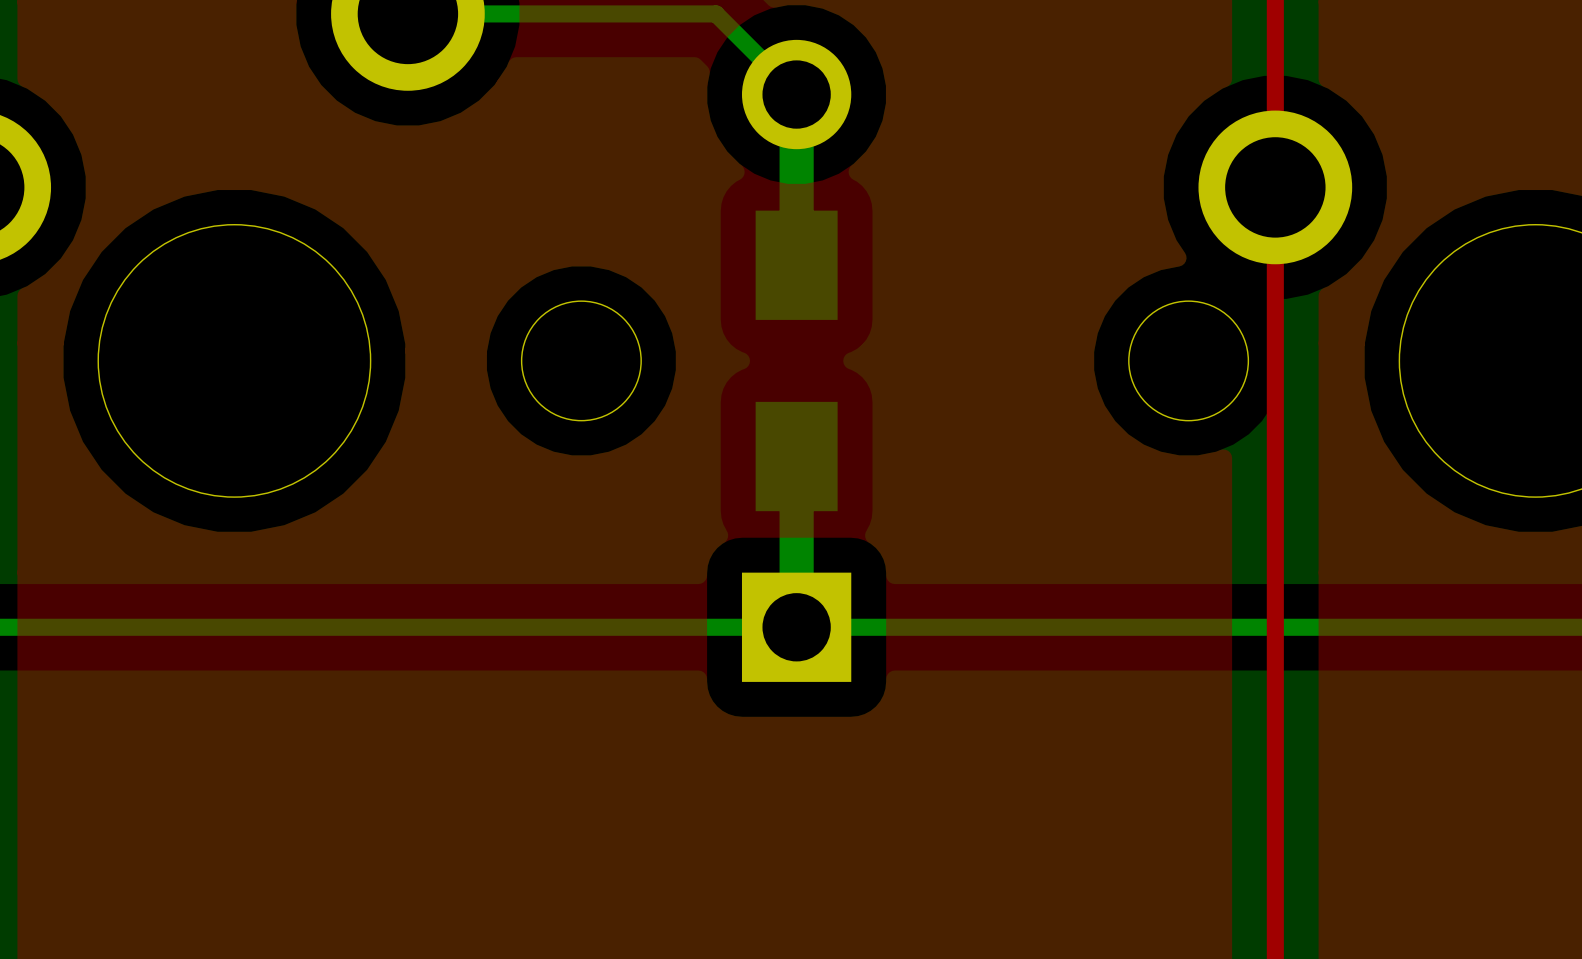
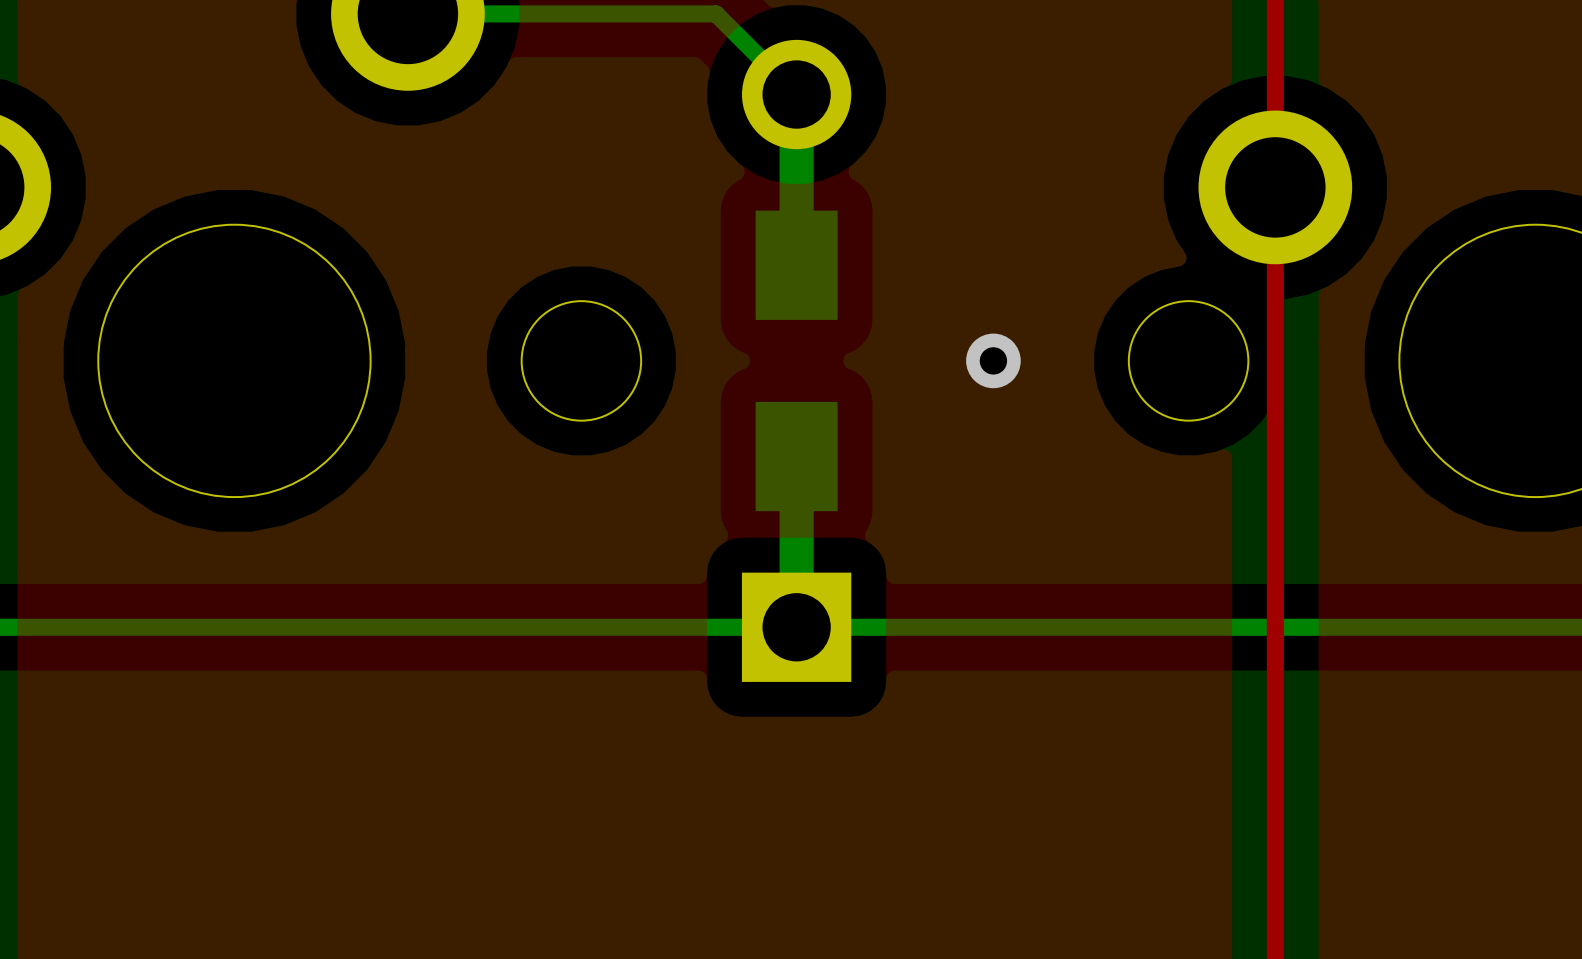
via: none -> (993, 360)

